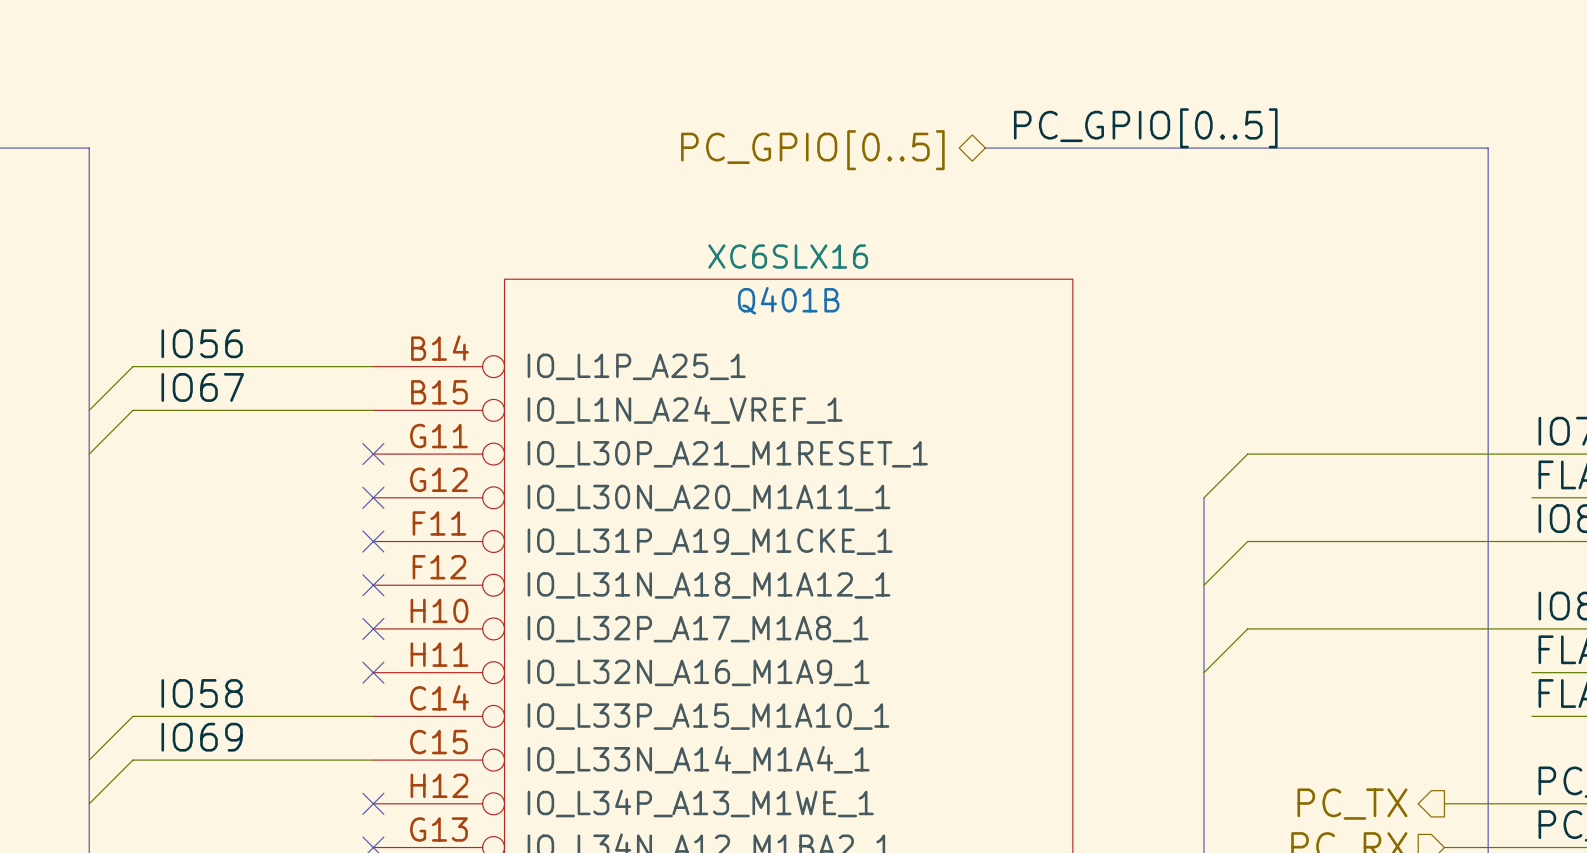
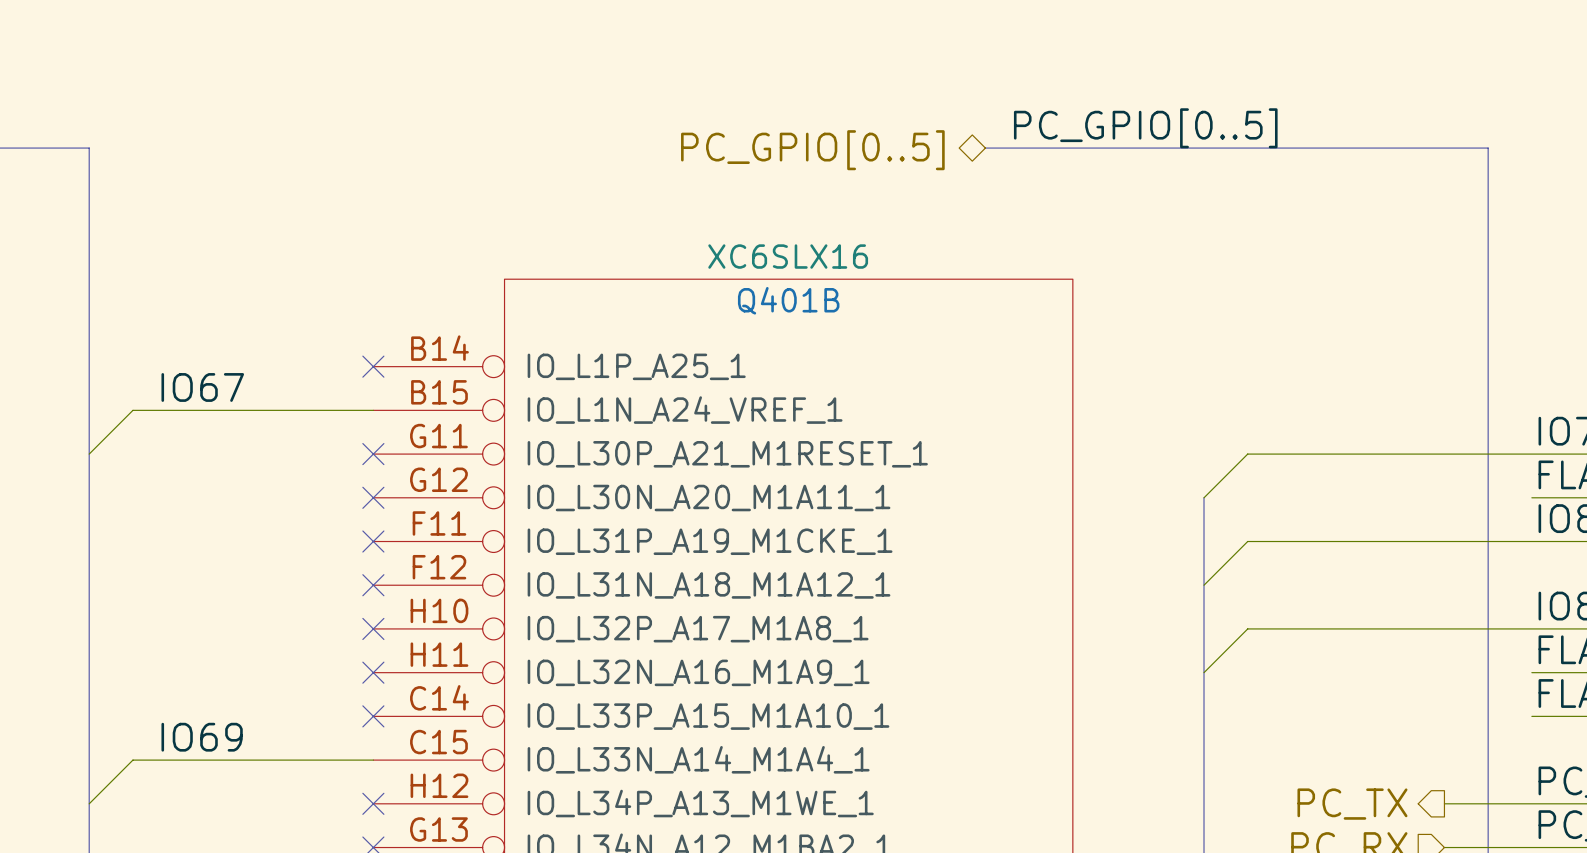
label: IO56 (202, 343) -> none
wire: (373, 366) (132, 366) (89, 410) -> none
no-connect mark: none -> (373, 366)
label: IO58 (202, 693) -> none
wire: (373, 716) (132, 716) (89, 760) -> none
no-connect mark: none -> (373, 716)

